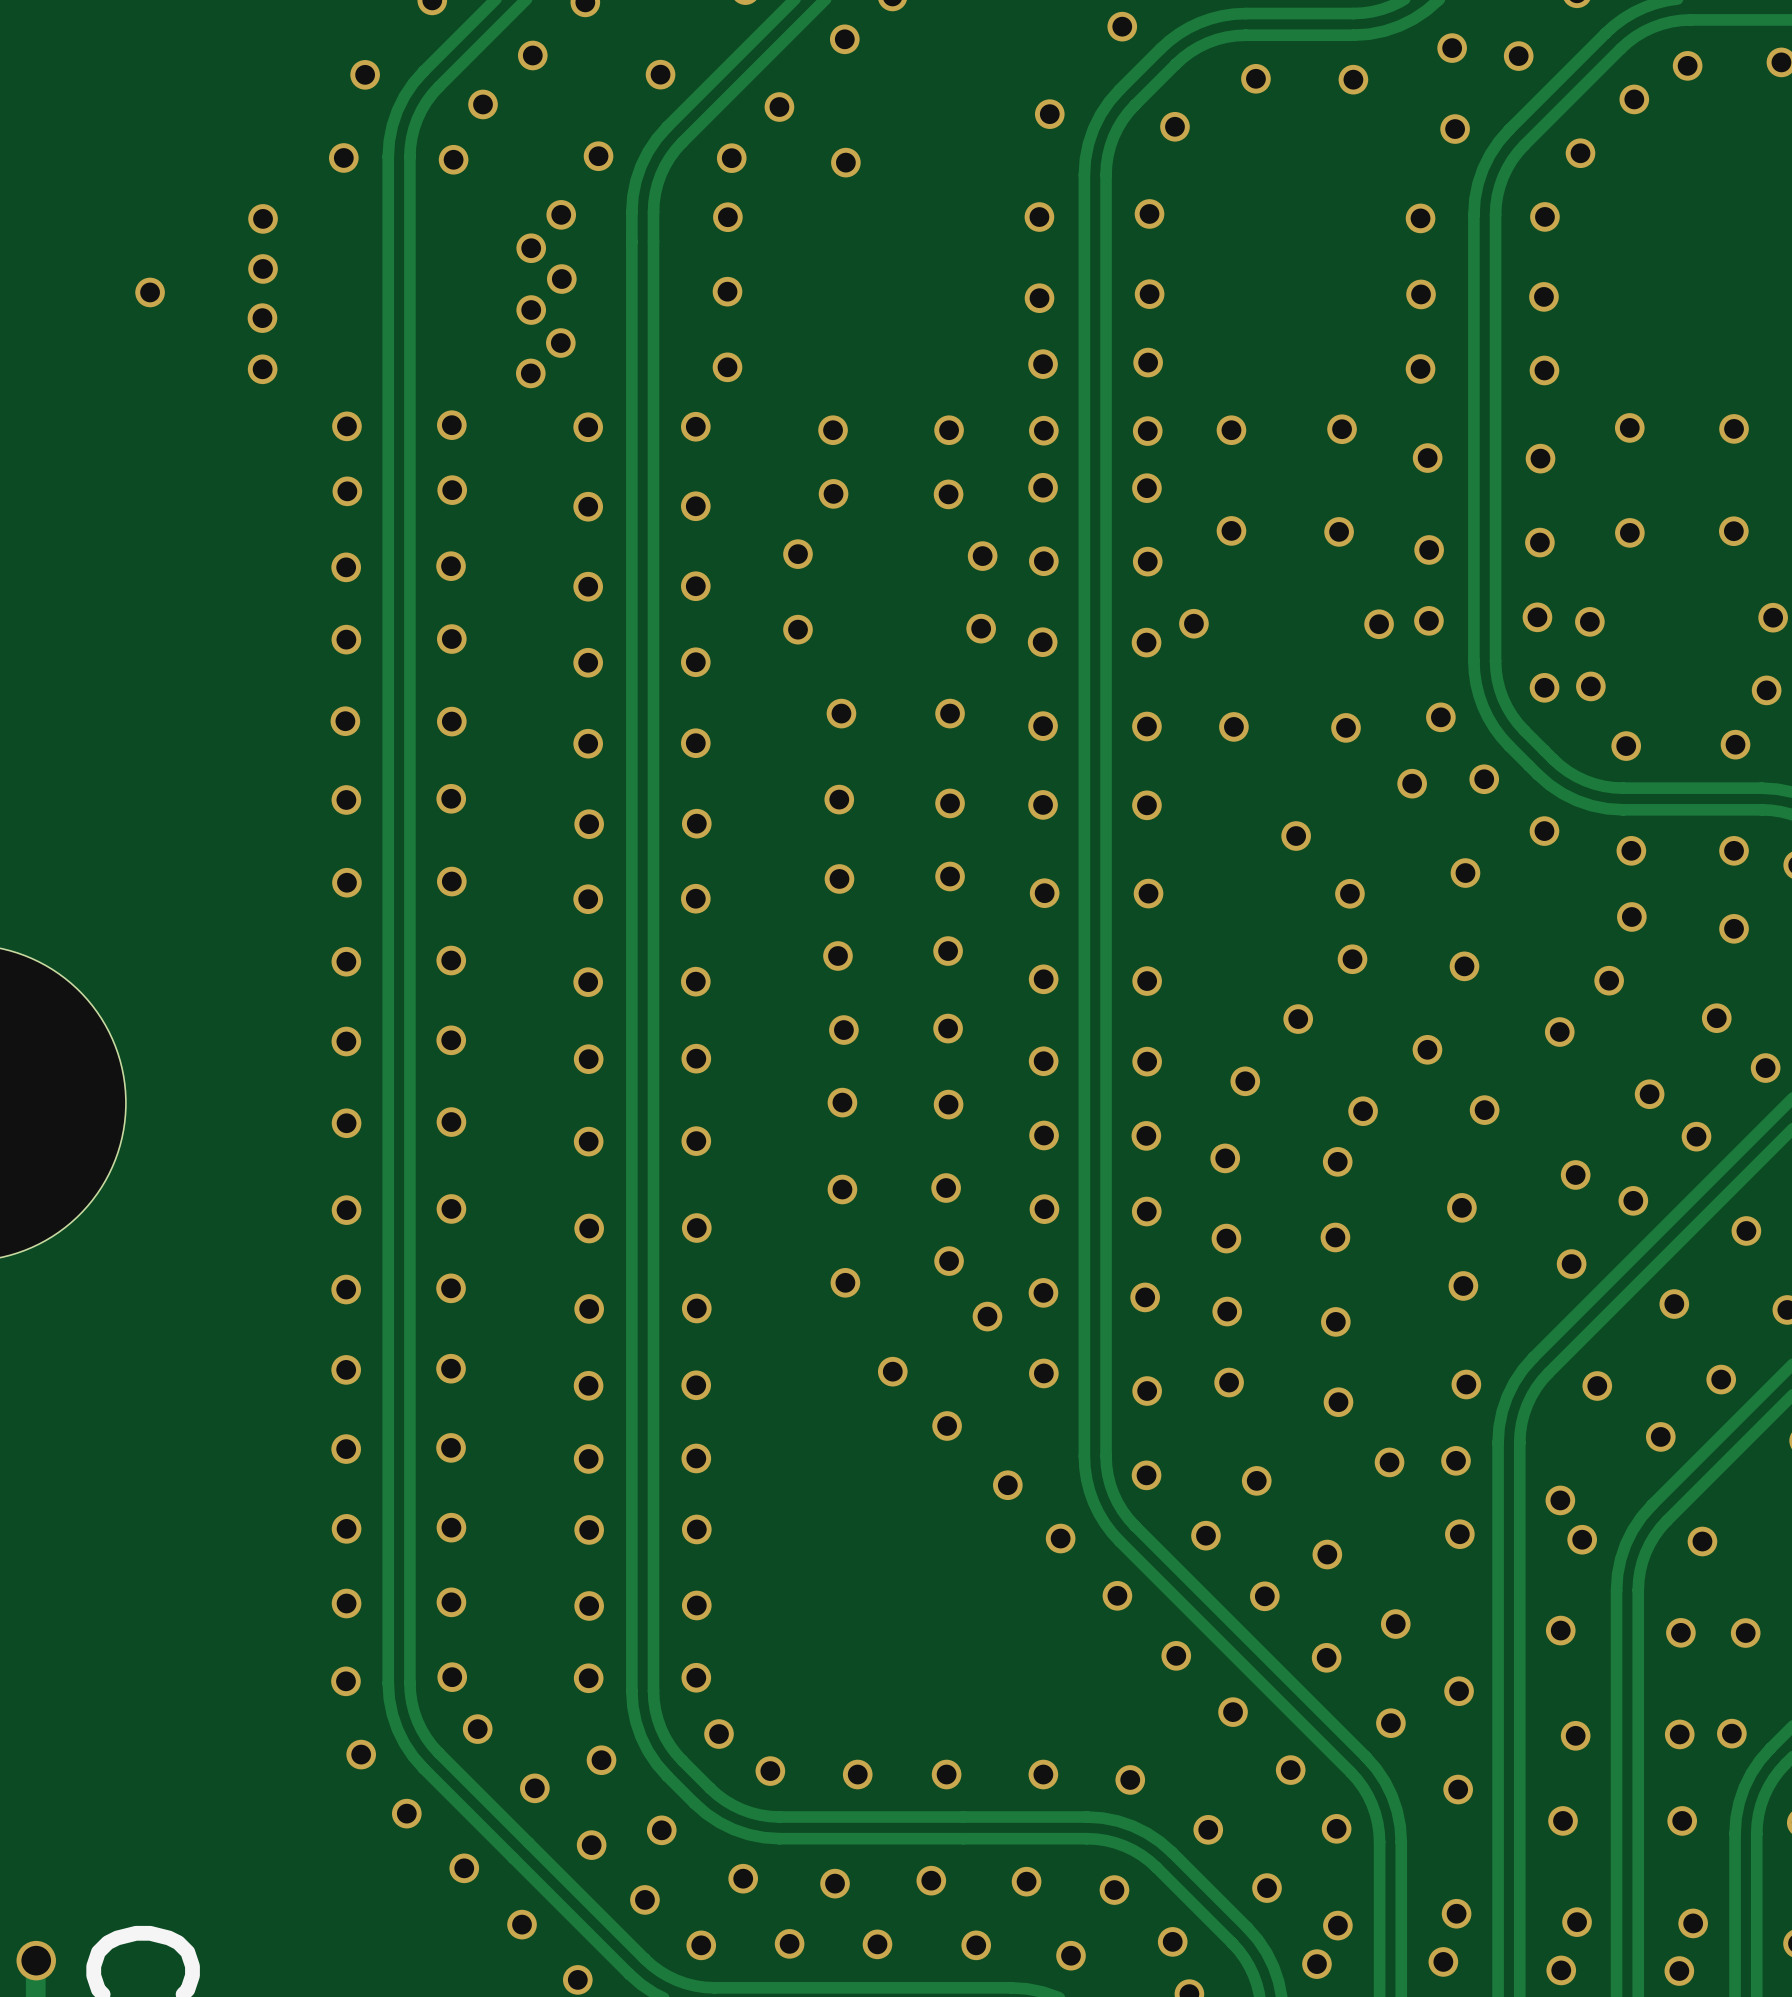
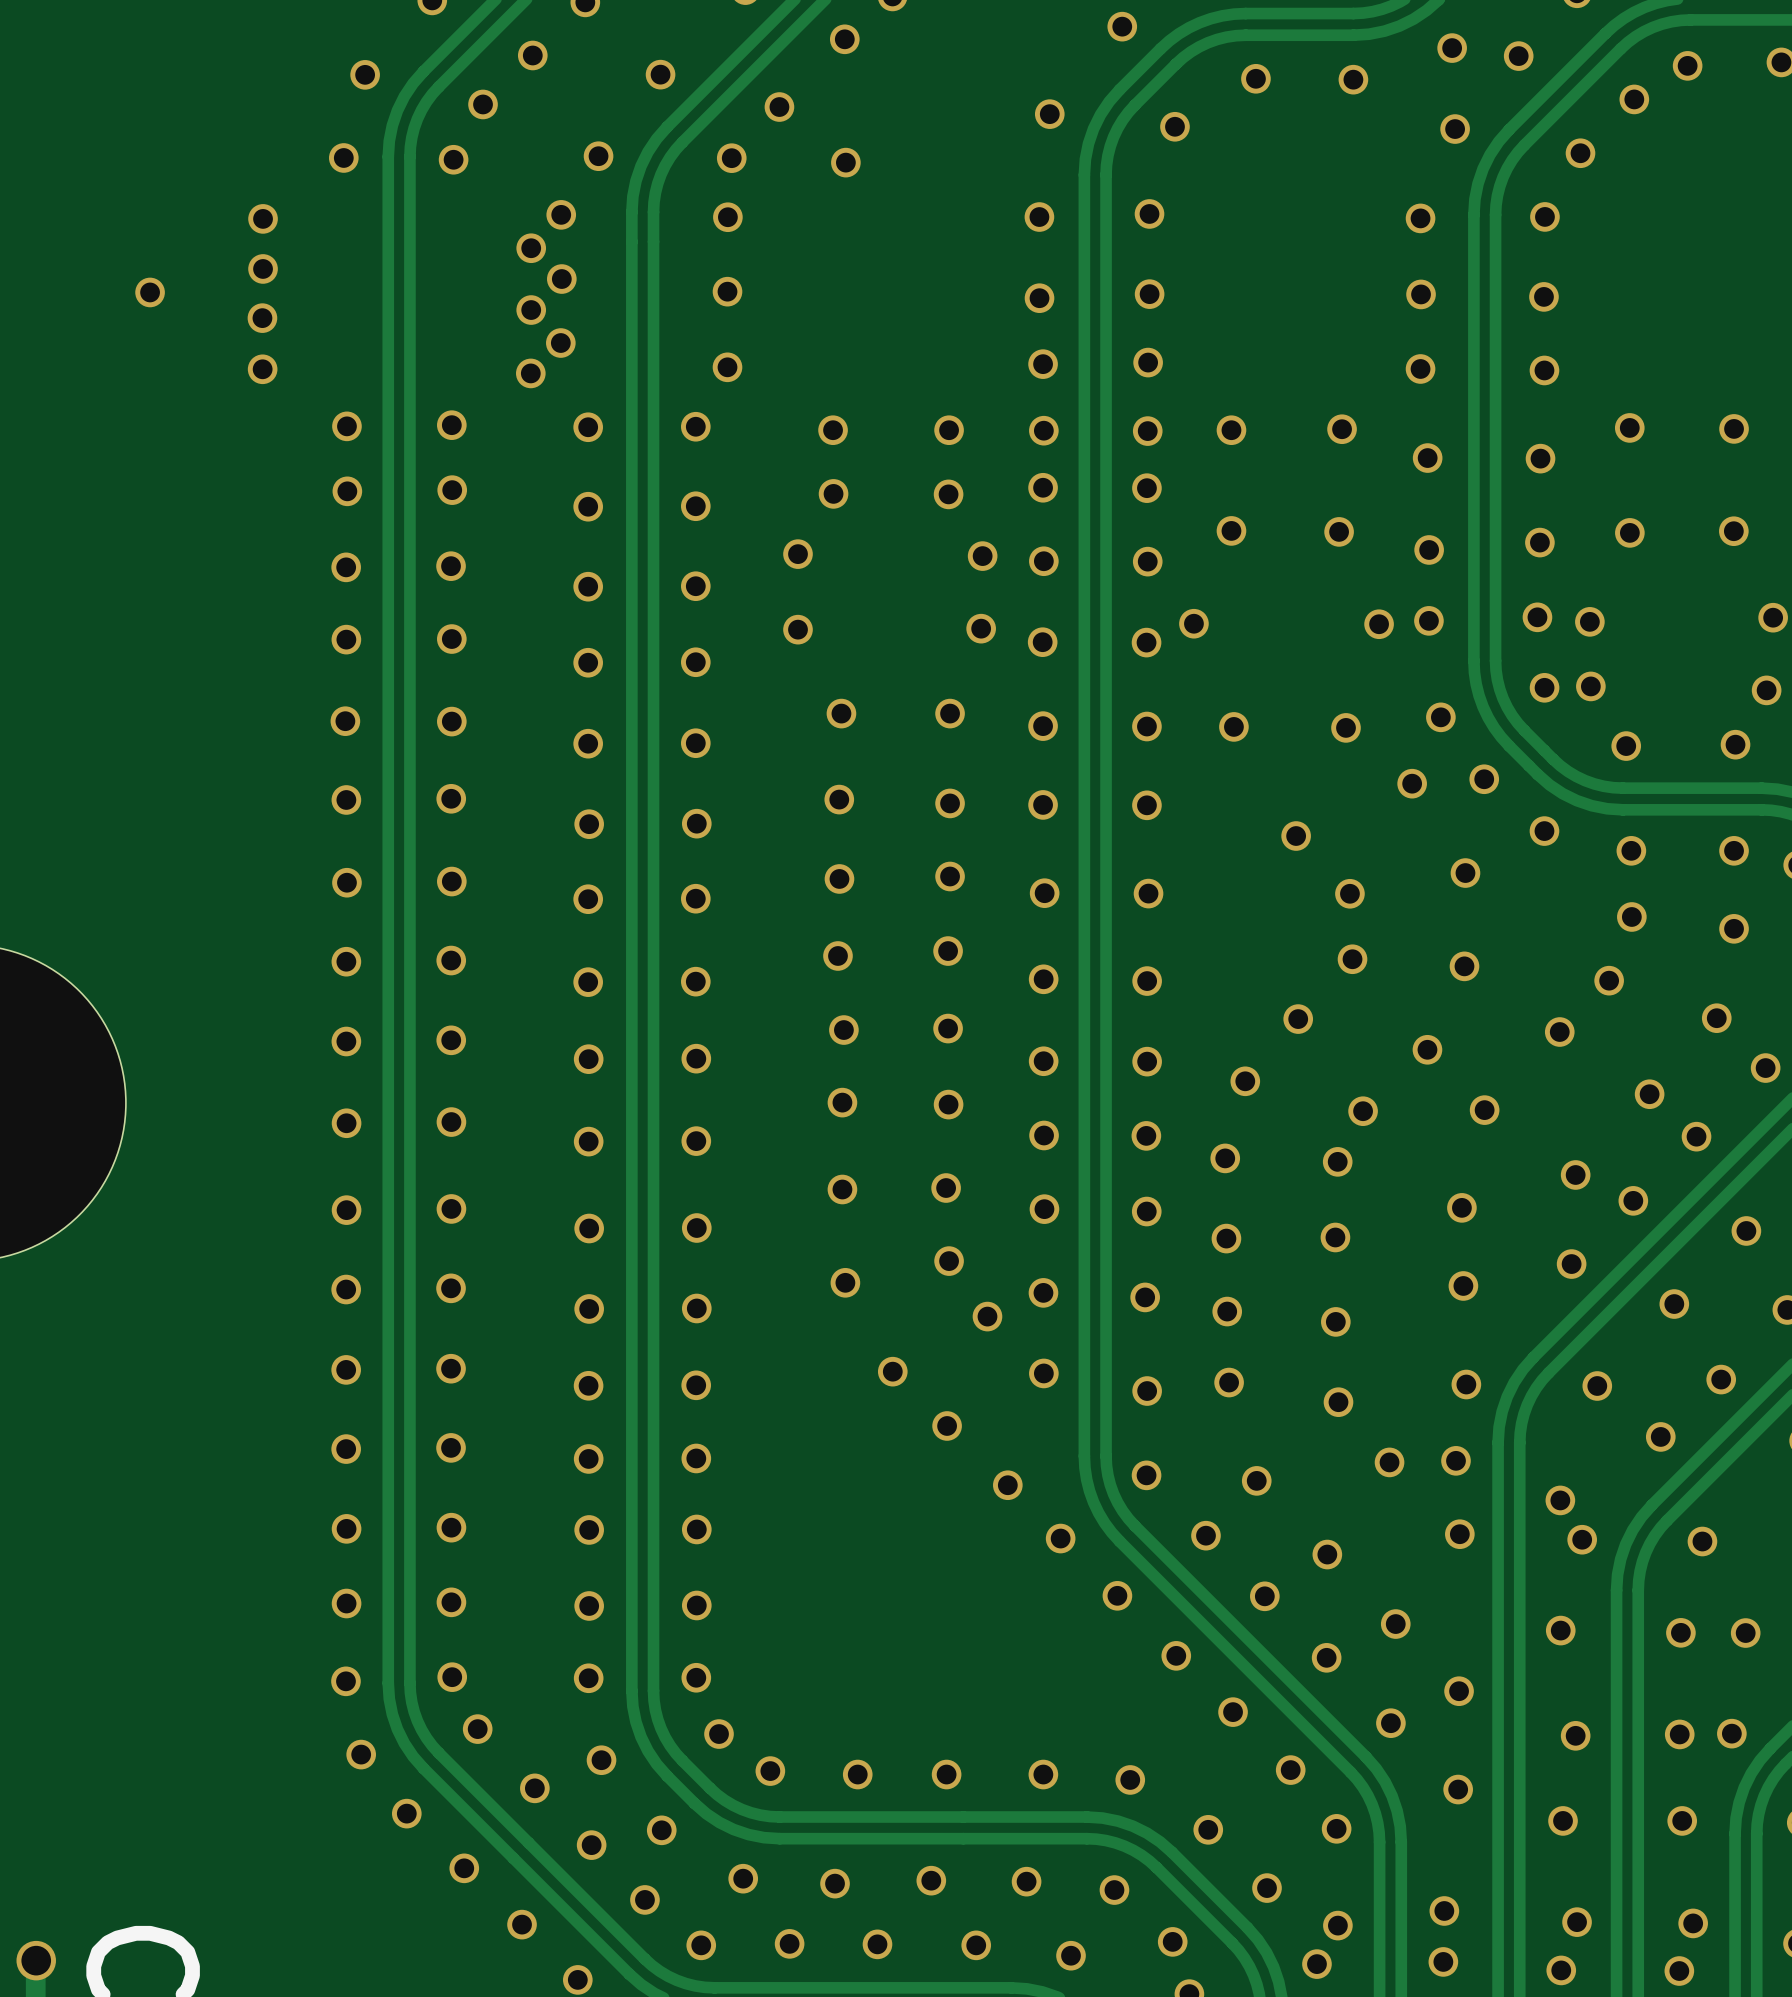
via position: (1456, 1913) -> (1444, 1910)

